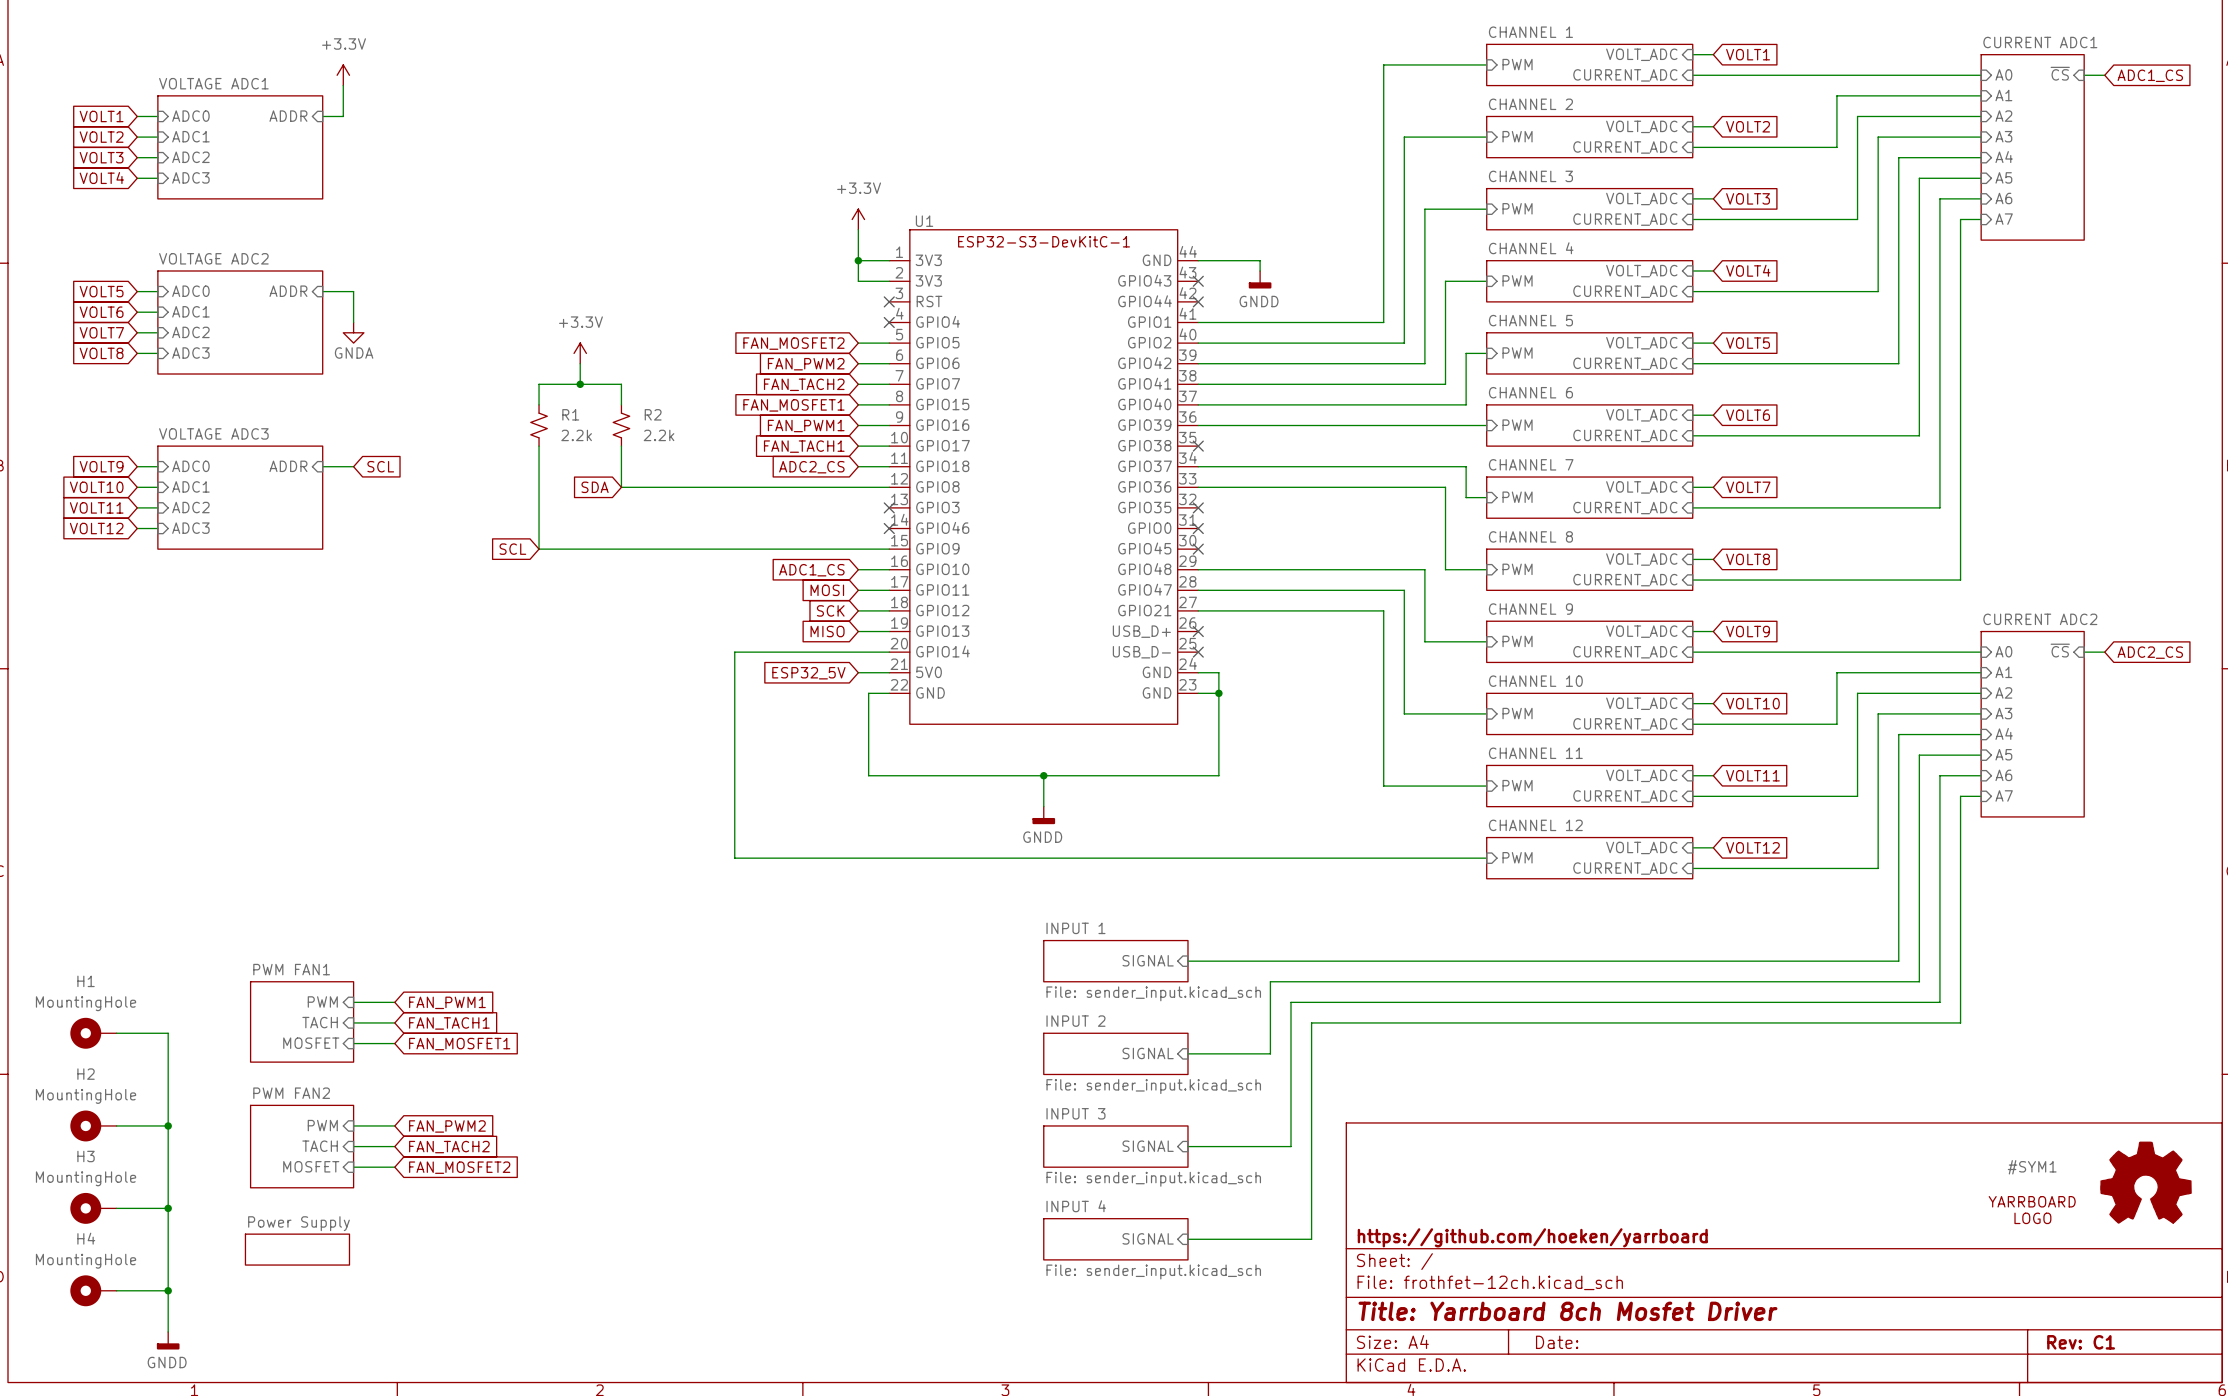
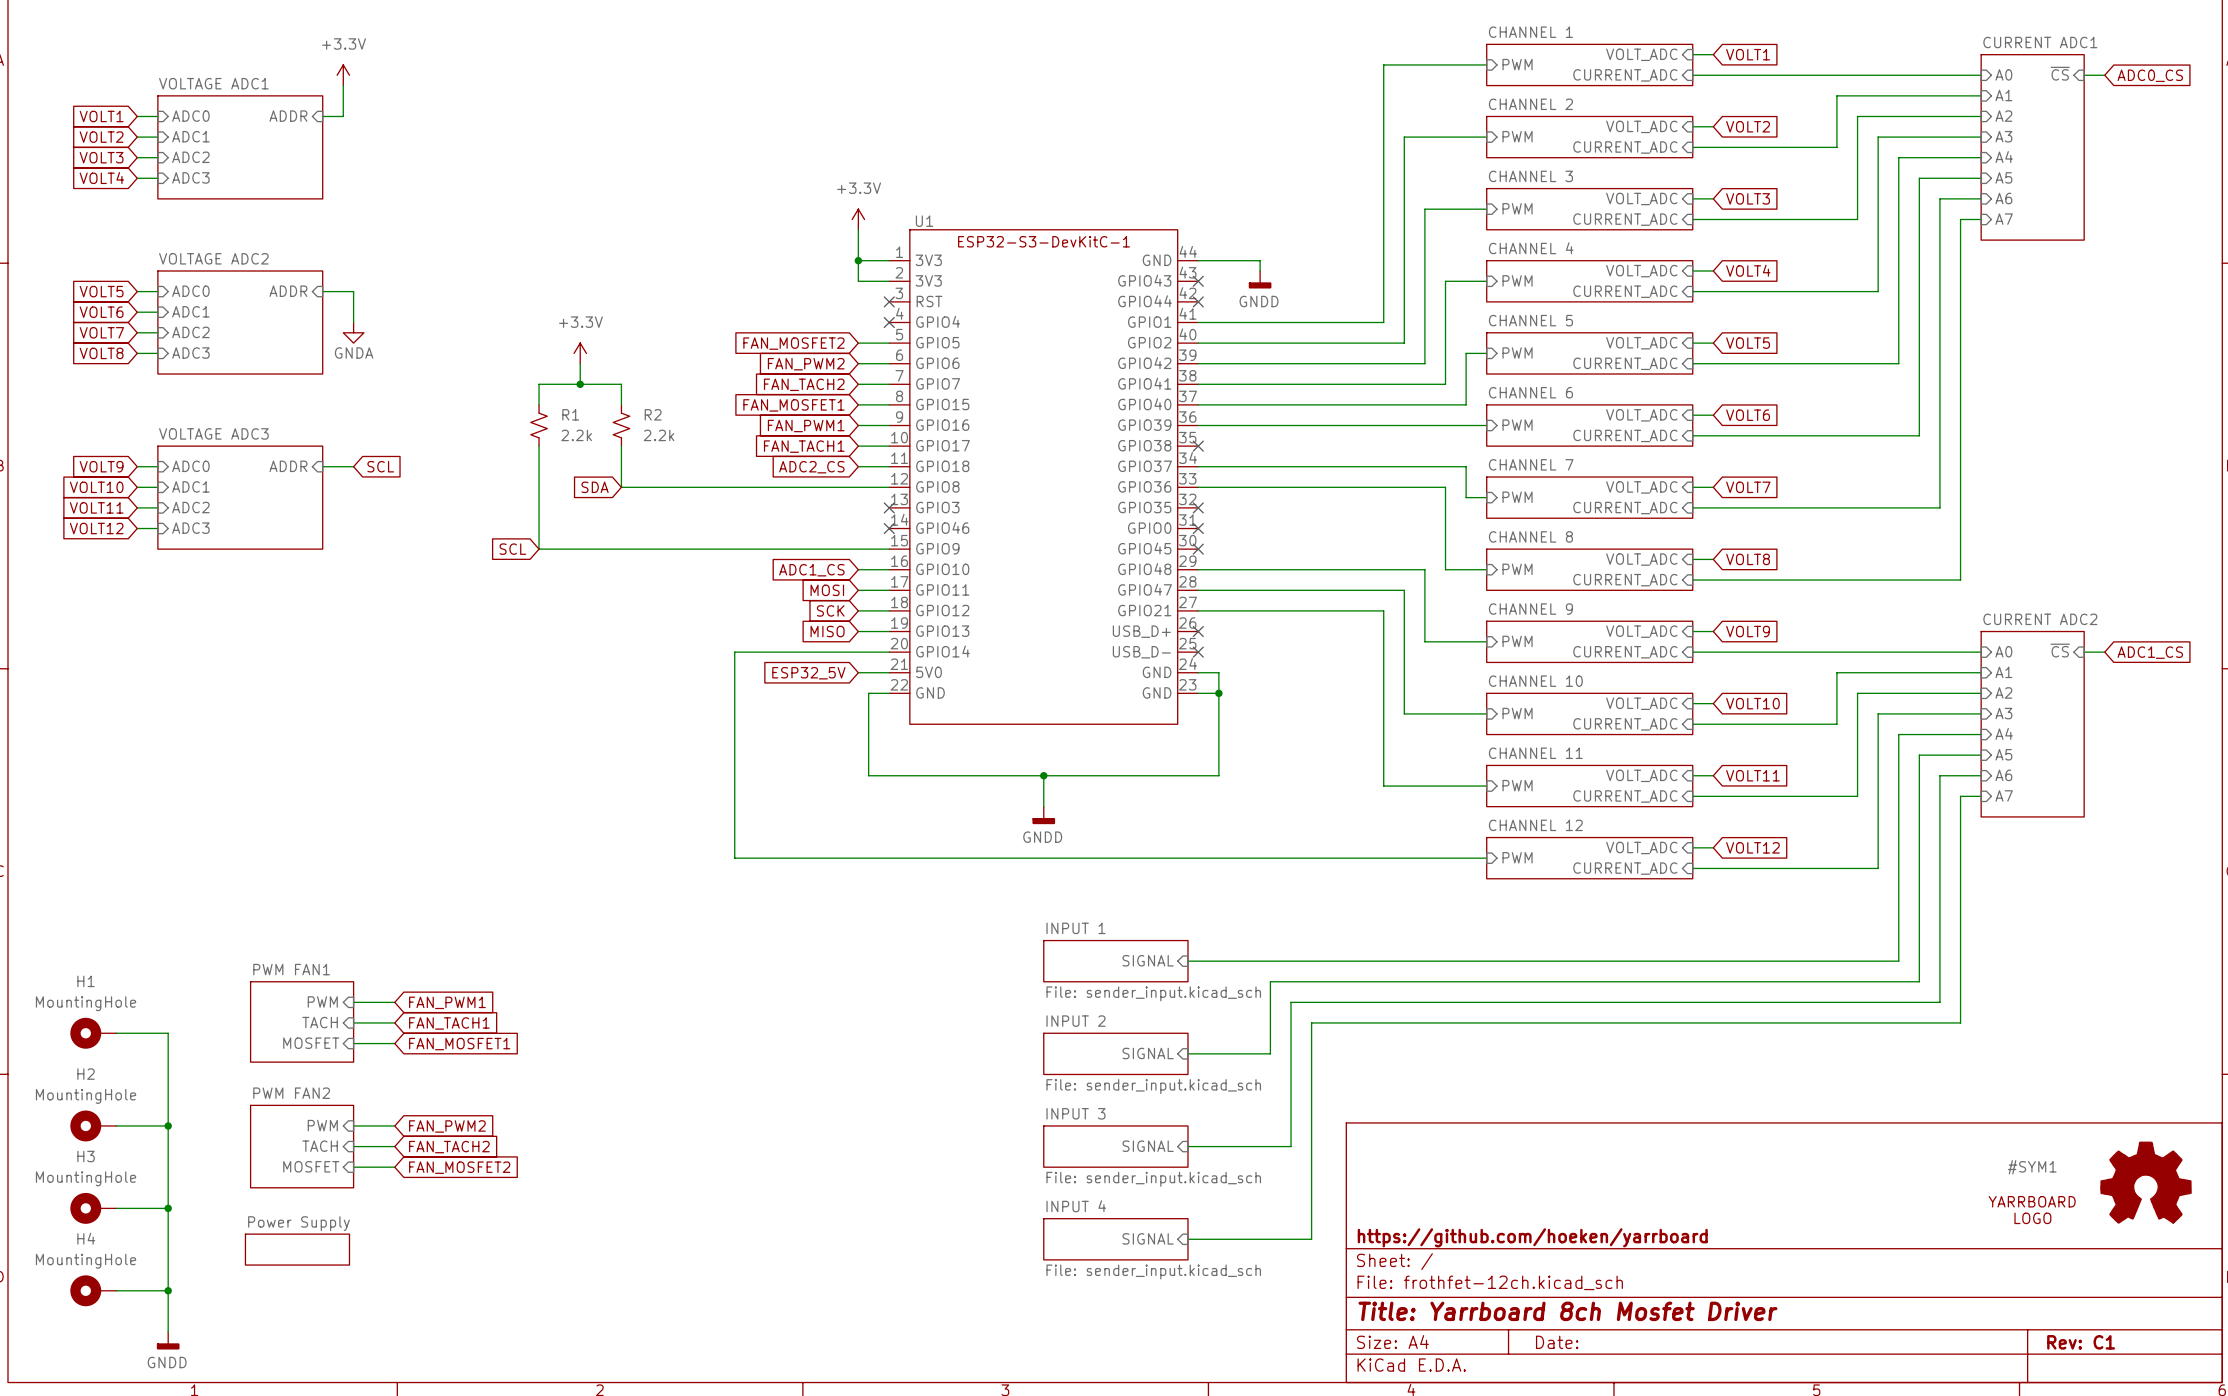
global label: ADC1_CS (2150, 75) -> ADC0_CS (2150, 75)
global label: ADC2_CS (2150, 652) -> ADC1_CS (2150, 652)

